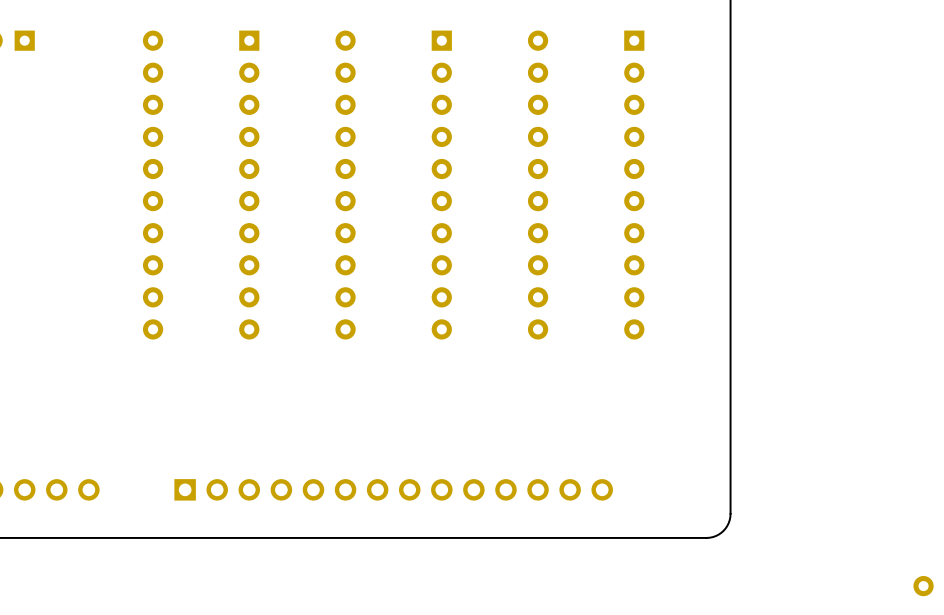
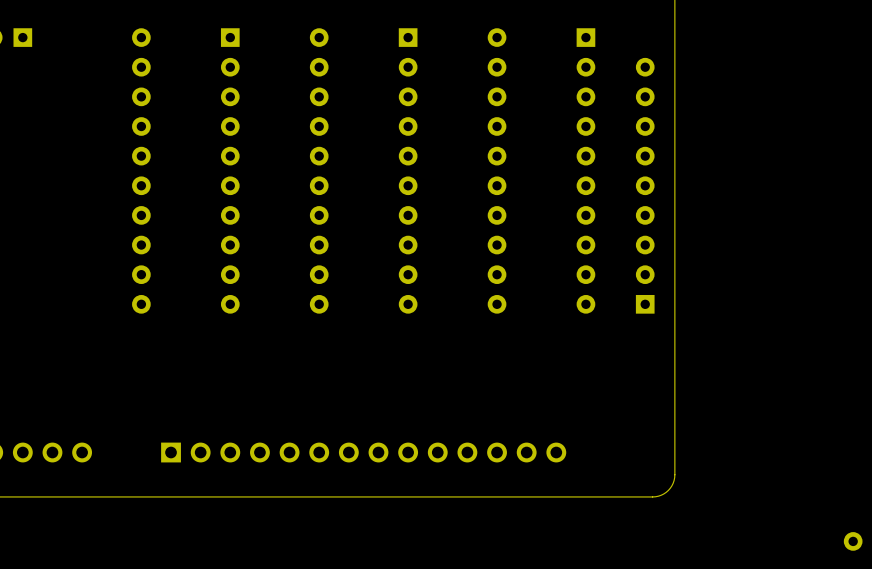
part: none -> (645, 185)

